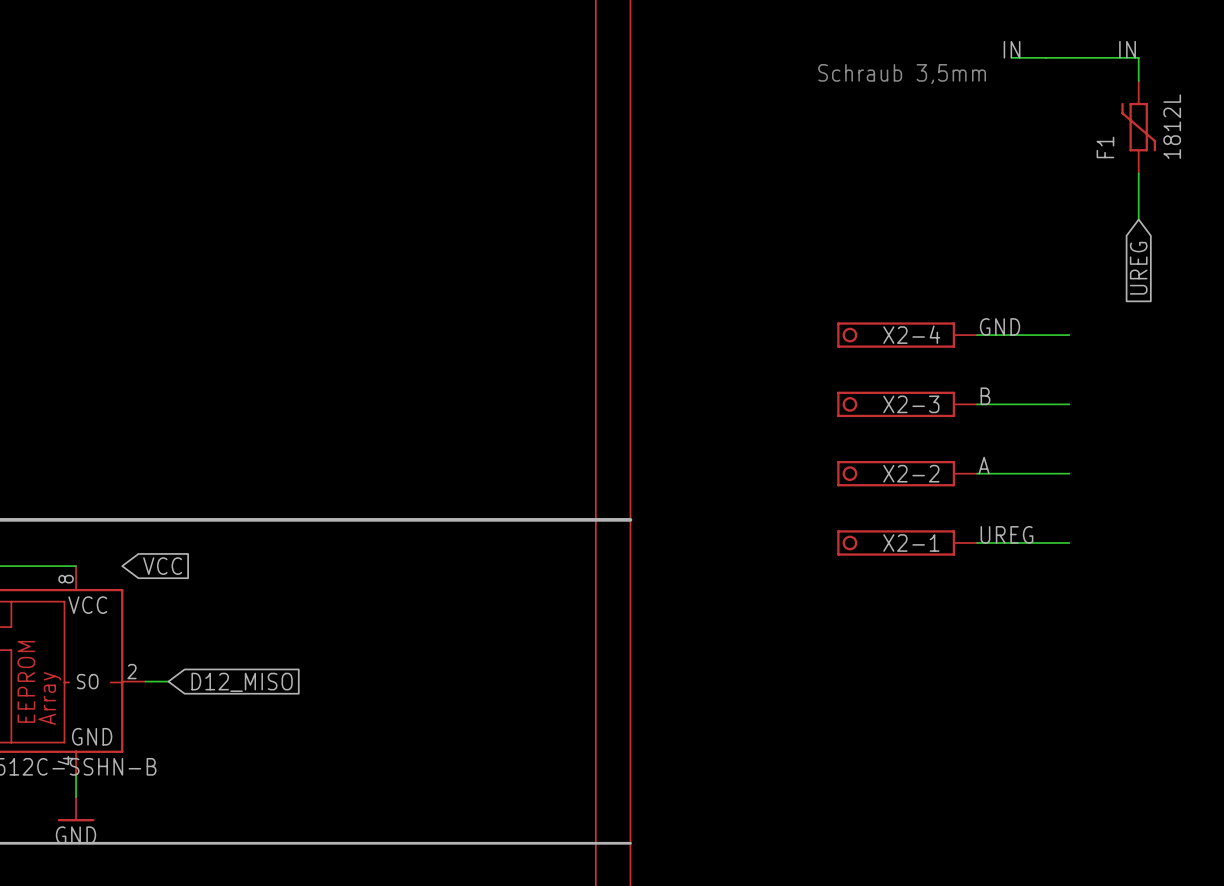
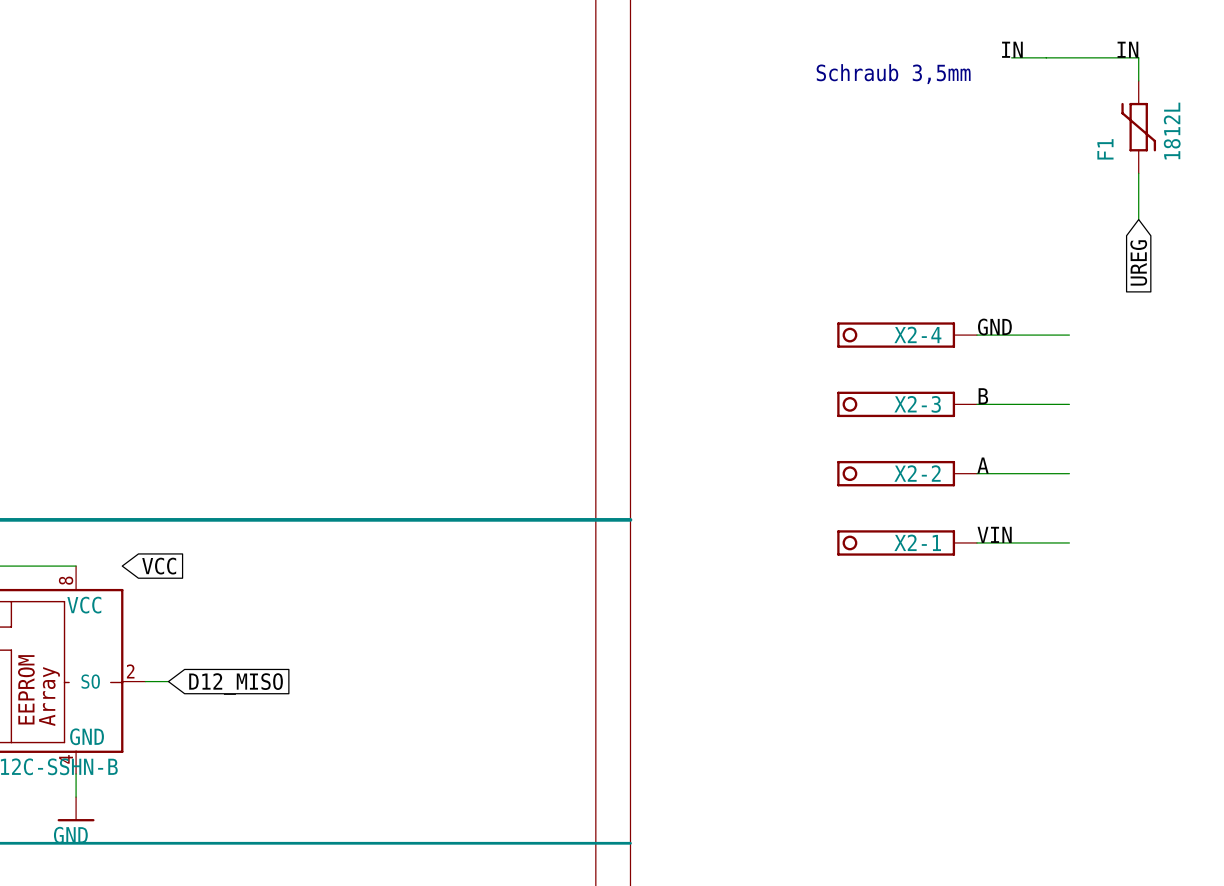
label: UREG (1006, 534) -> VIN (994, 534)

